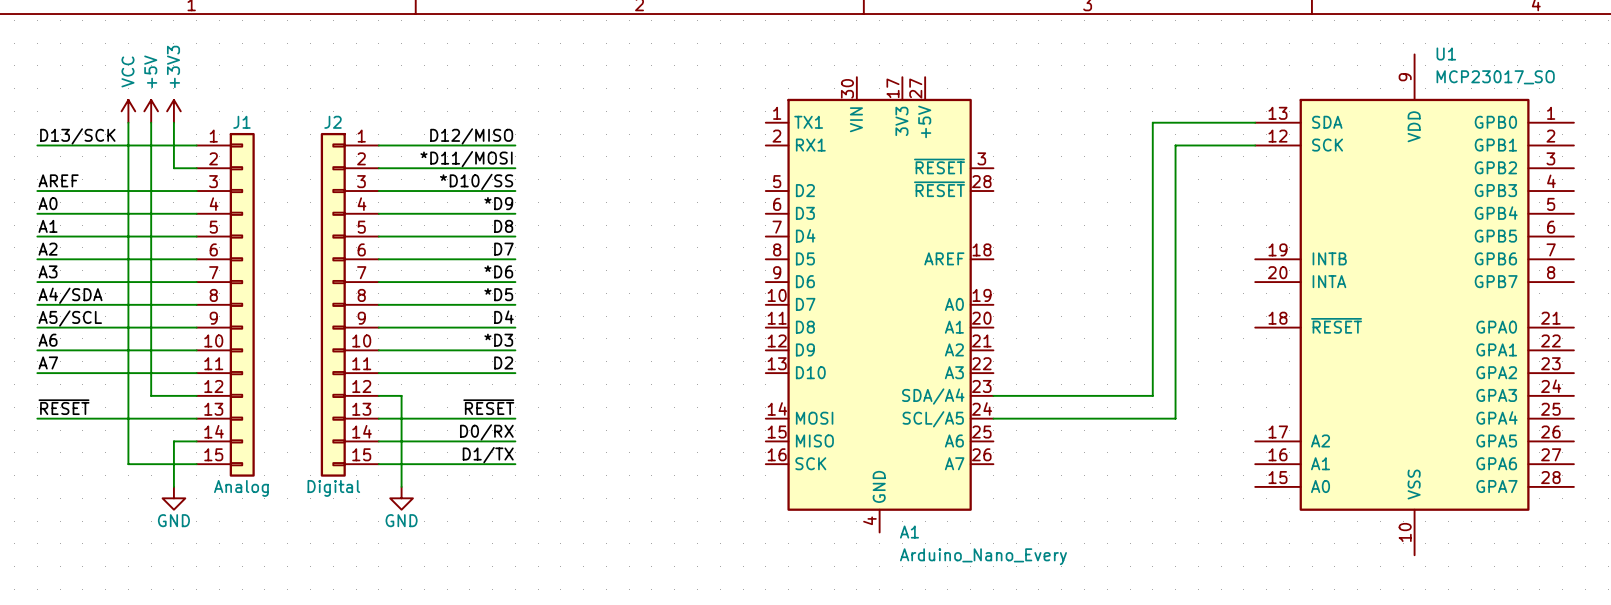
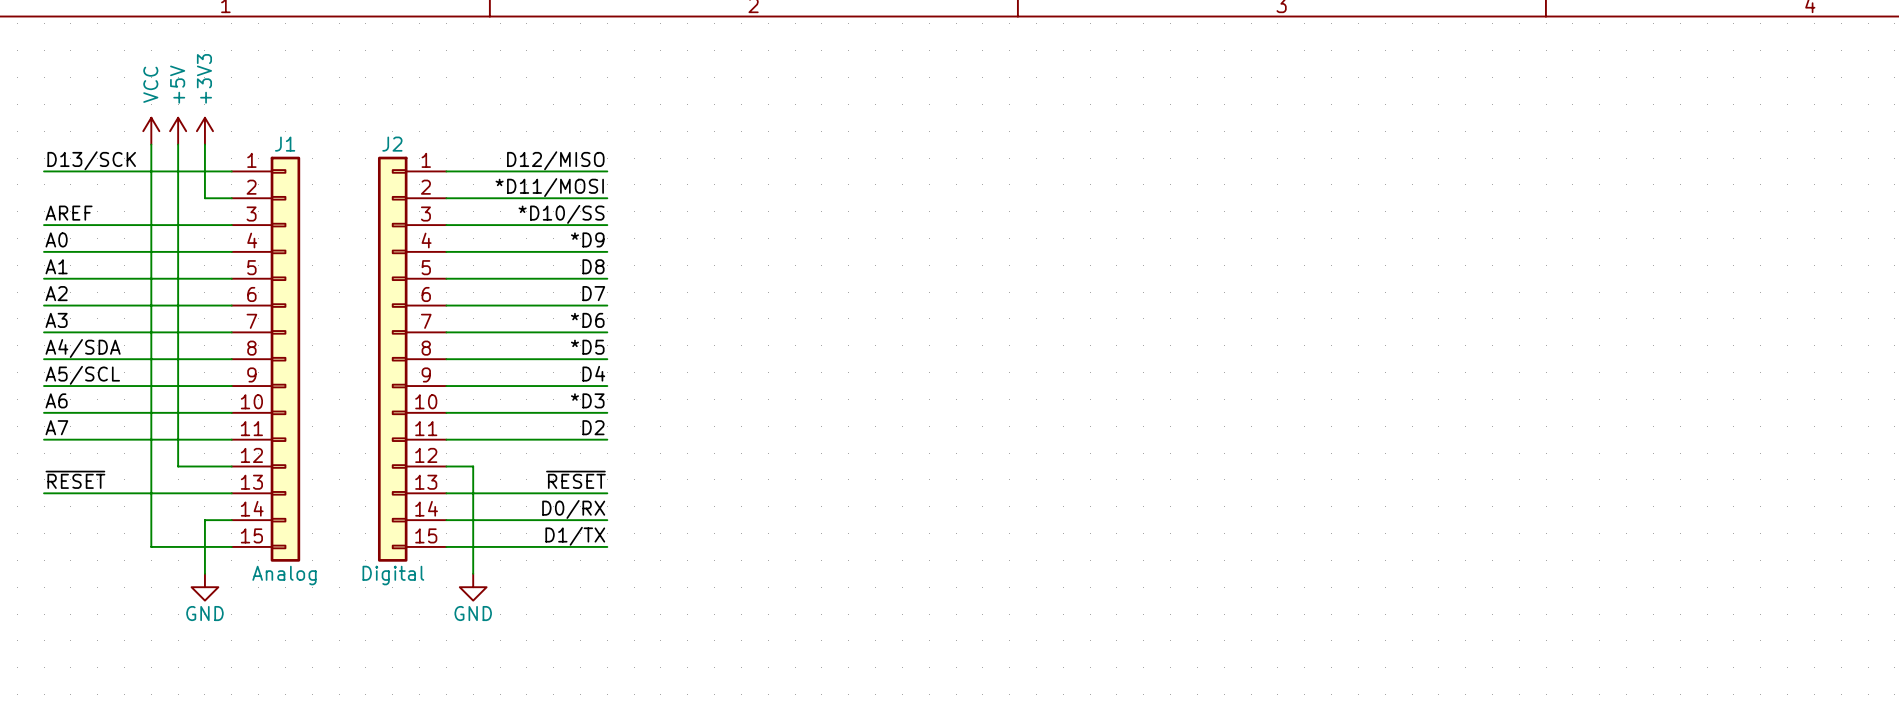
wire: (1255, 122) (1152, 122) (1152, 395) (993, 395) -> none
wire: (1255, 145) (1175, 145) (1175, 418) (993, 418) -> none
A1: Arduino_Nano_Every (879, 304) -> none
U1: MCP23017_SO (1414, 304) -> none

